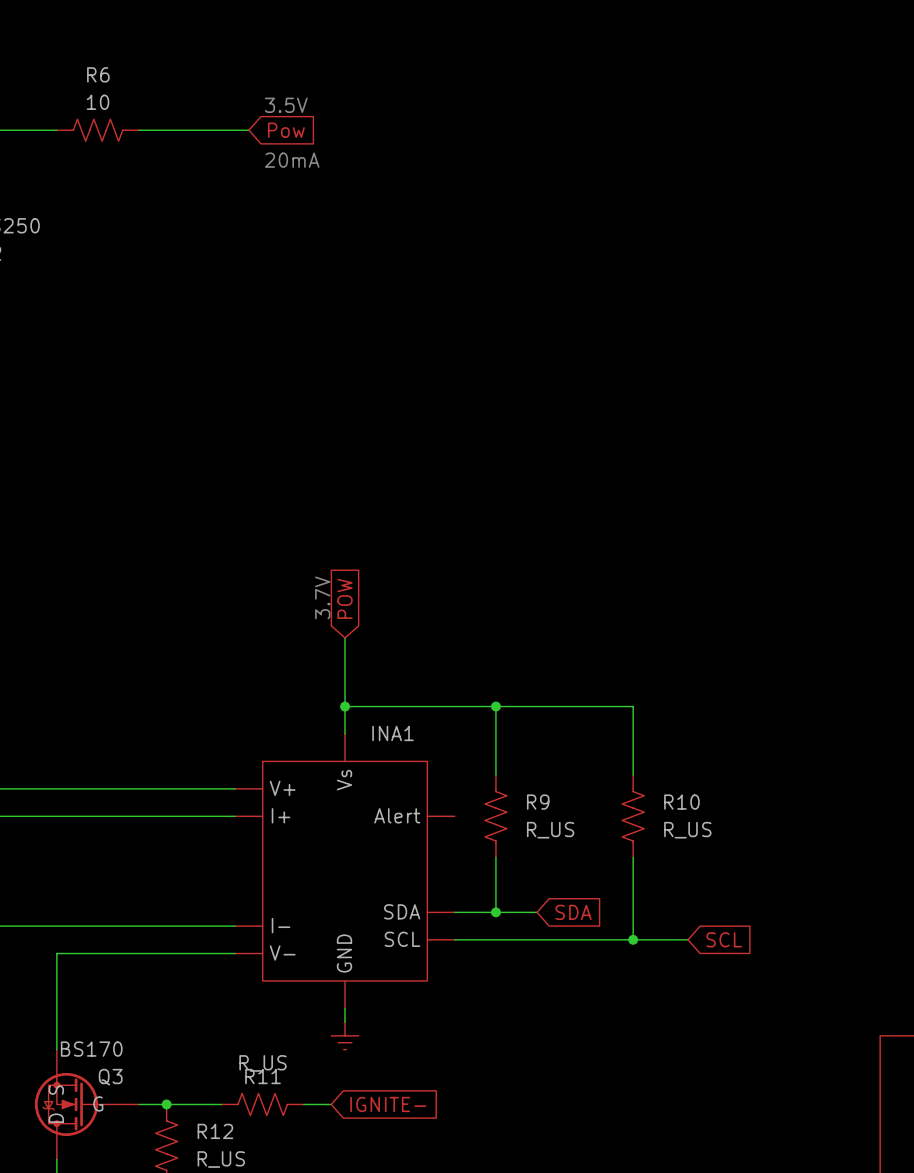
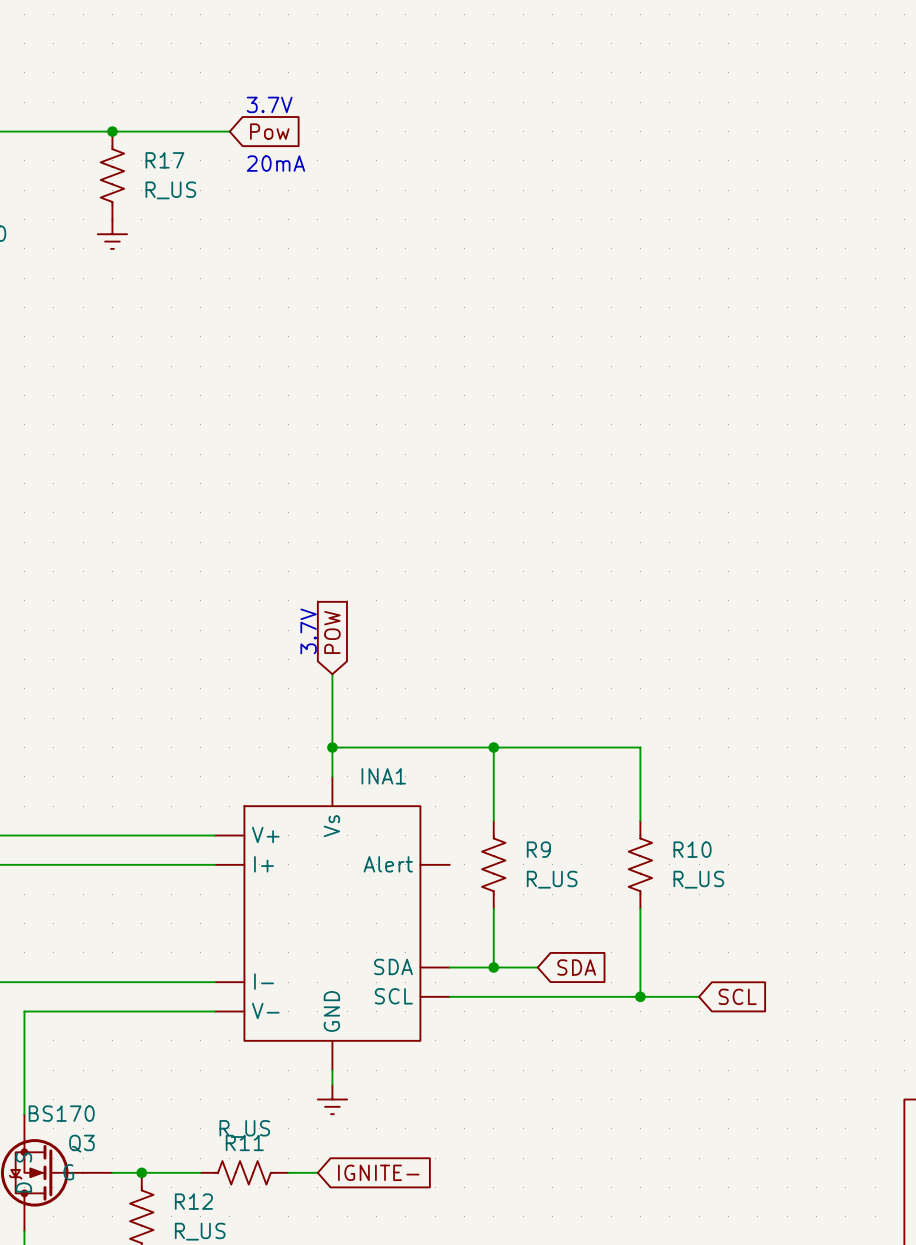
text: 3.5V (286, 105) -> 3.7V (269, 104)
R6: 10 (98, 130) -> none
junction: none -> (112, 131)
R17: none -> R_US (112, 175)
power symbol: none -> (112, 234)

